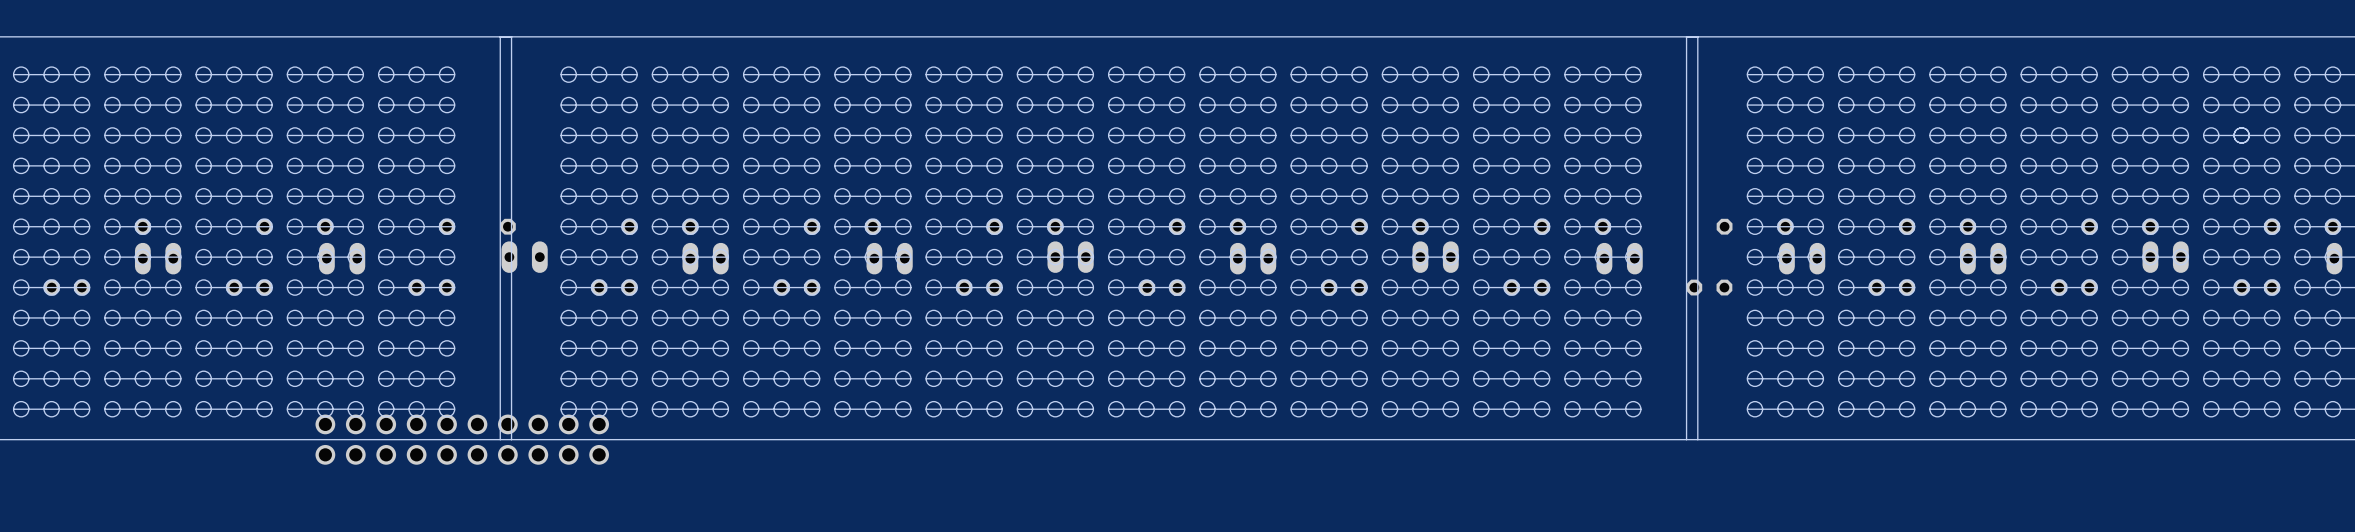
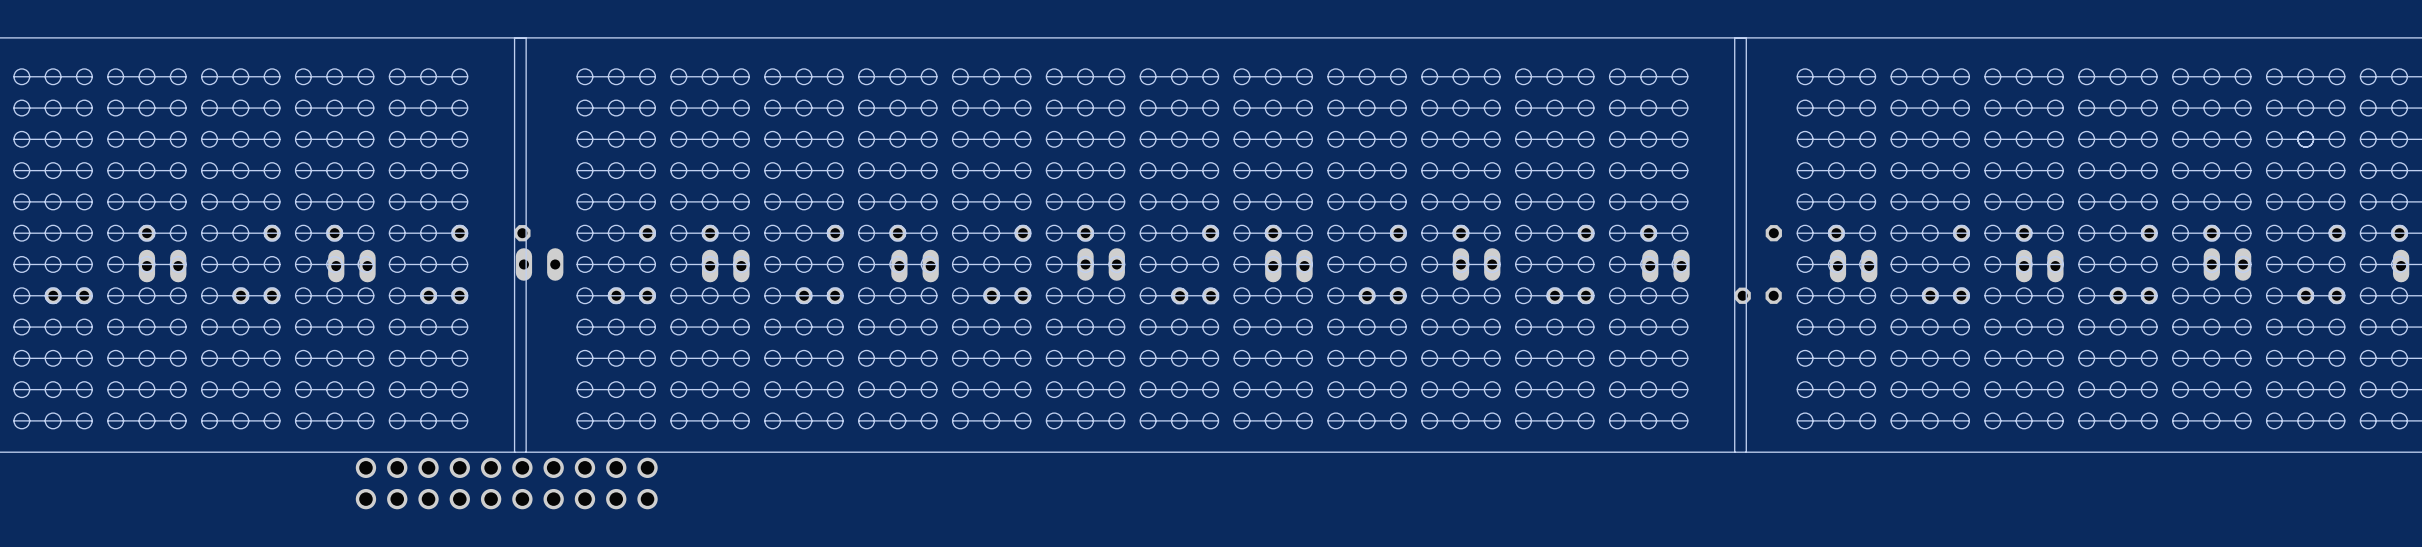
part position: (462, 439) -> (506, 483)

